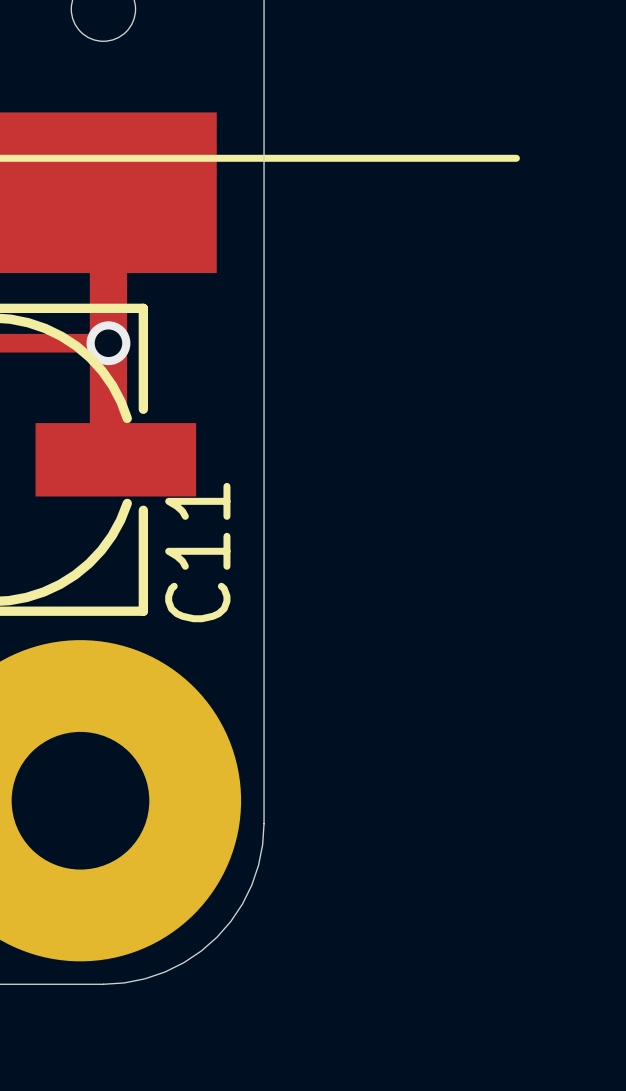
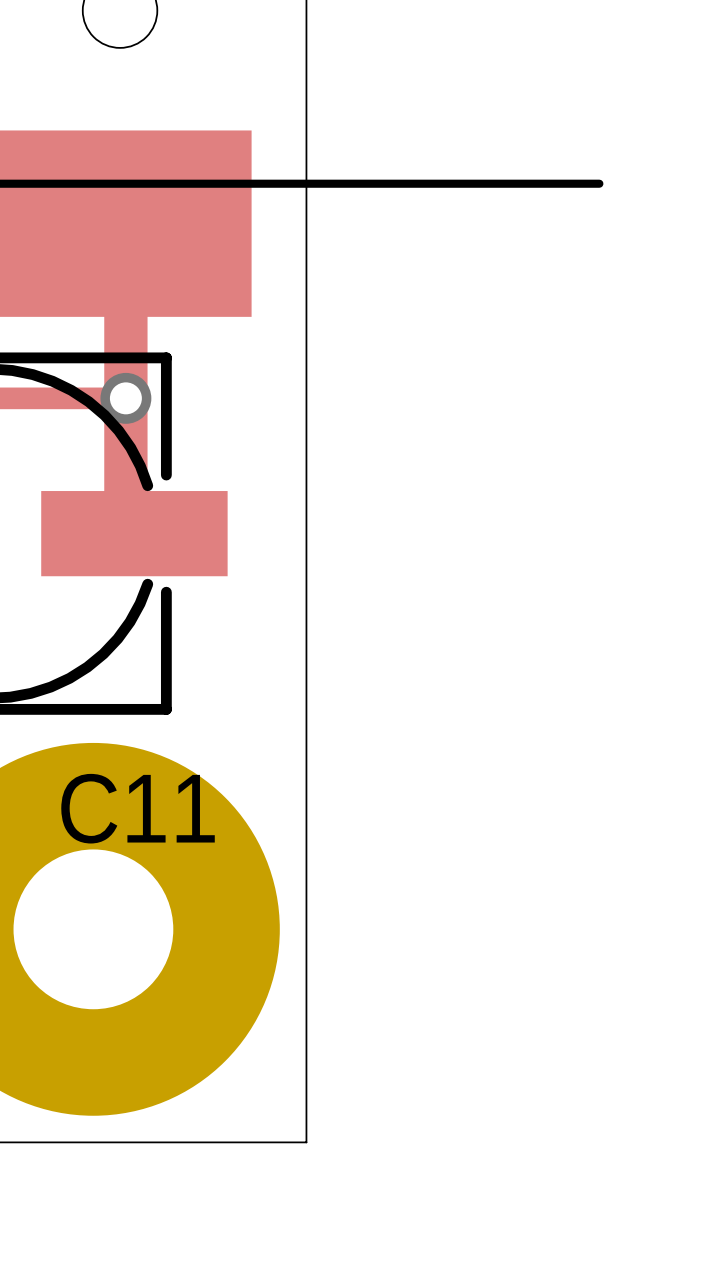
C11 name rotation: 0° (197, 552) -> 90° clockwise (138, 808)
C11 name position: C11 (197, 552) -> C11 (138, 808)
board edge: (264, 823) (262, 844) (251, 885) (242, 903) (216, 937) (183, 962) (164, 972) (124, 982) (103, 984) -> (306, 955) (306, 1142) (120, 1142)

